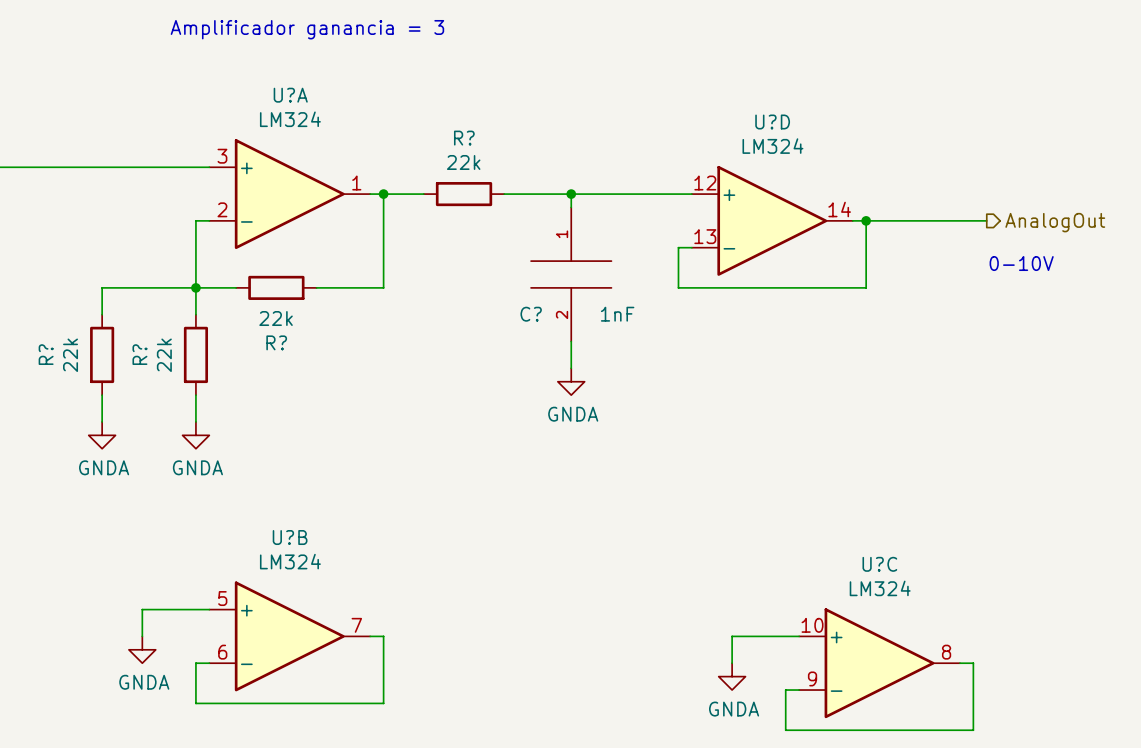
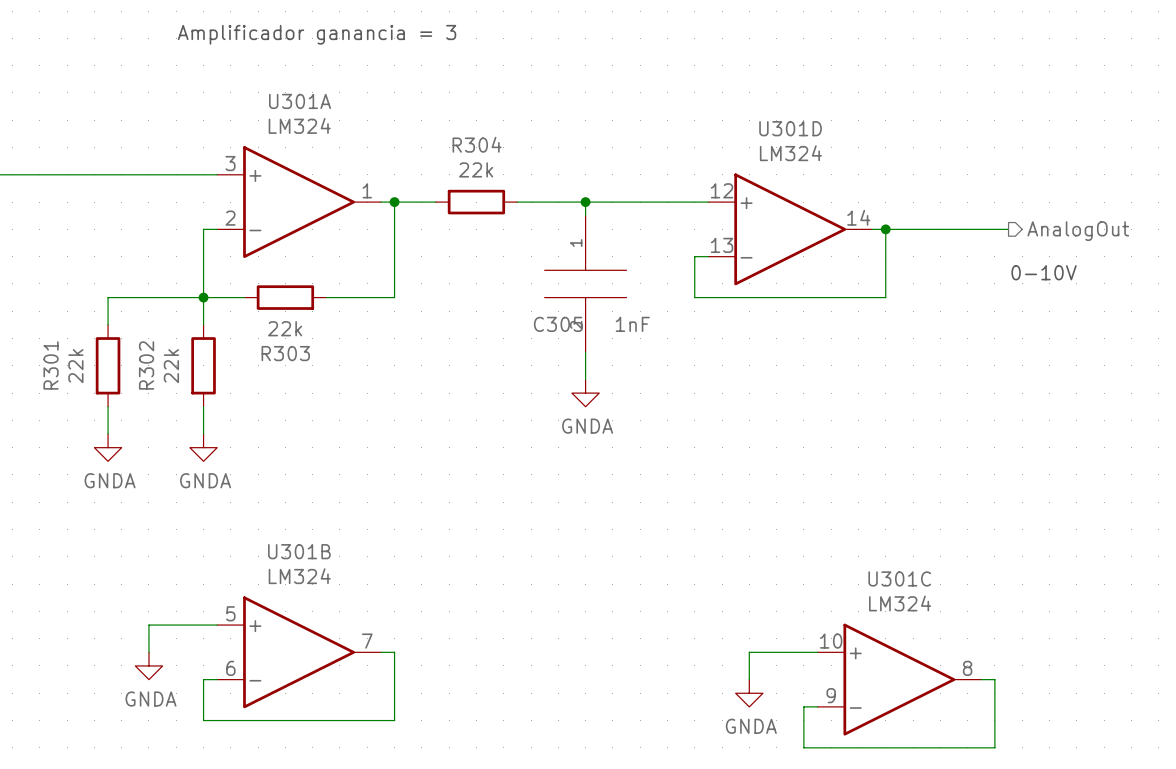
U?A name: U?A (290, 95) -> U301A (300, 101)
U?D name: U?D (772, 122) -> U301D (790, 128)
R? name: R? (464, 138) -> R304 (477, 144)
C? name: C? (531, 314) -> C305 (558, 324)
R? name: R? (276, 342) -> R303 (285, 353)
R? name: R? (46, 354) -> R301 (51, 365)
R? name: R? (139, 354) -> R302 (146, 365)
U?B name: U?B (290, 537) -> U301B (299, 551)
U?C name: U?C (879, 564) -> U301C (899, 578)

